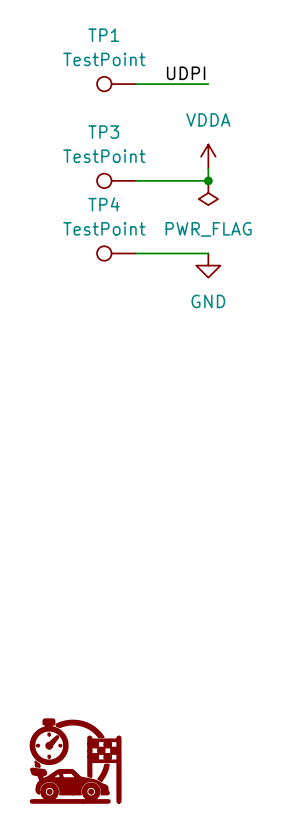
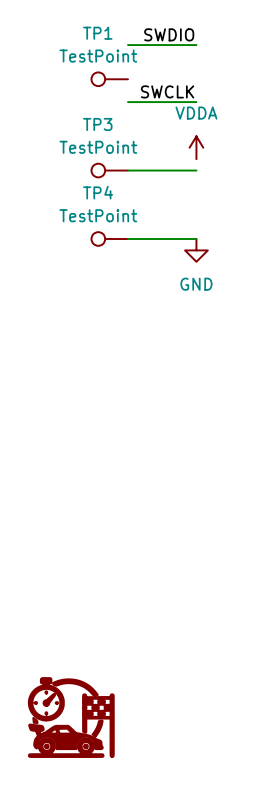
label: none -> SWDIO (169, 34)
wire: none -> (127, 45) (196, 45)
label: UDPI (186, 73) -> none
wire: (135, 84) (208, 84) -> (127, 102) (196, 102)
label: none -> SWCLK (167, 91)
wire: (208, 168) (208, 180) -> none
junction: (208, 180) -> none
power symbol: PWR_FLAG (208, 192) -> none

